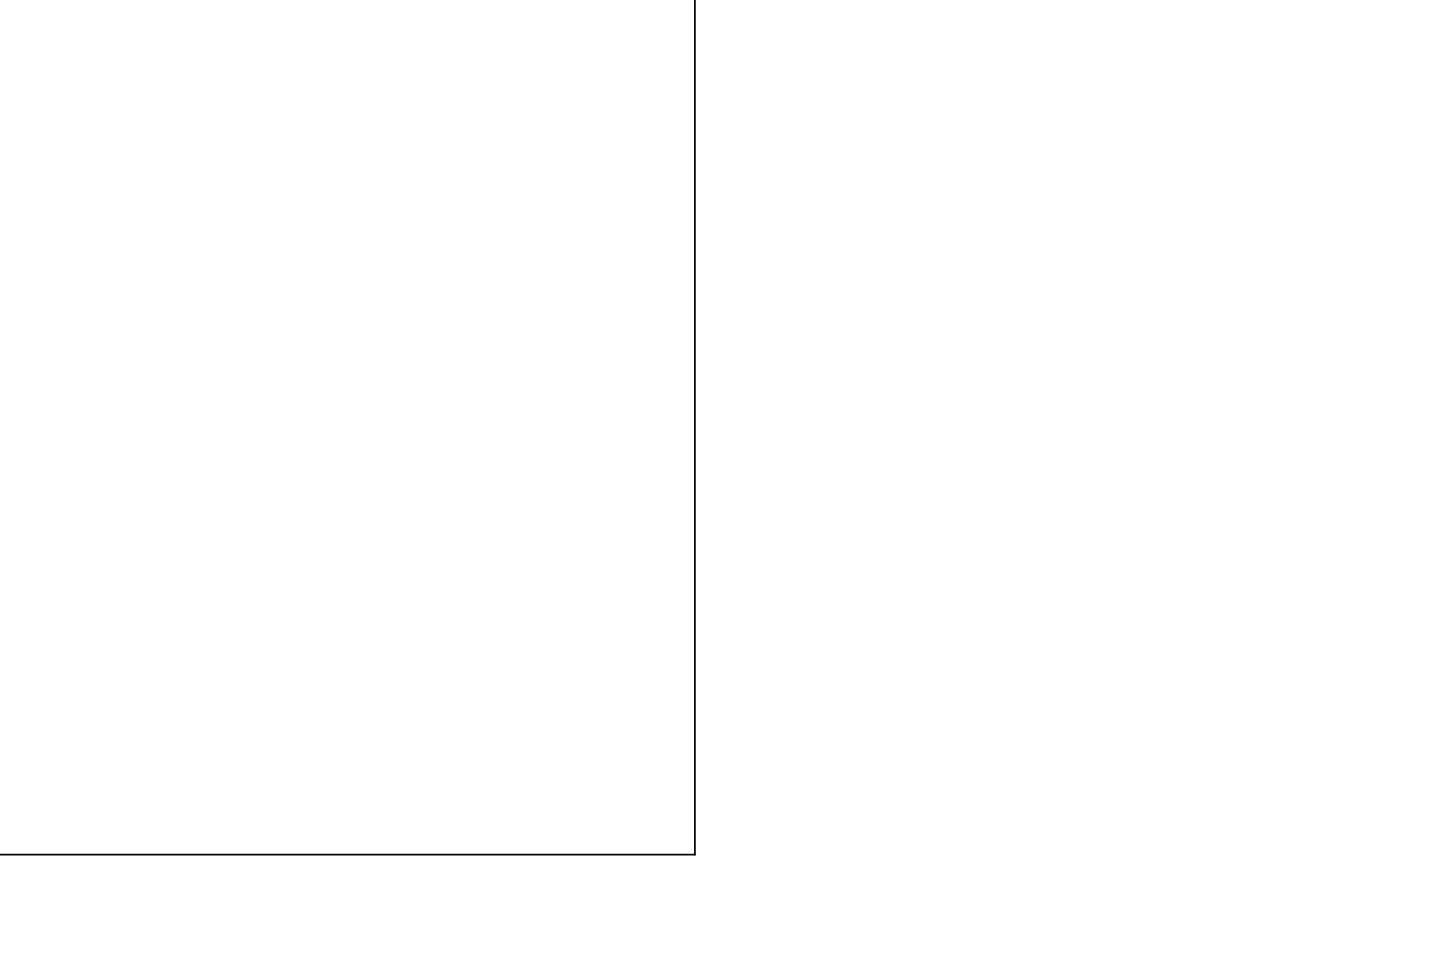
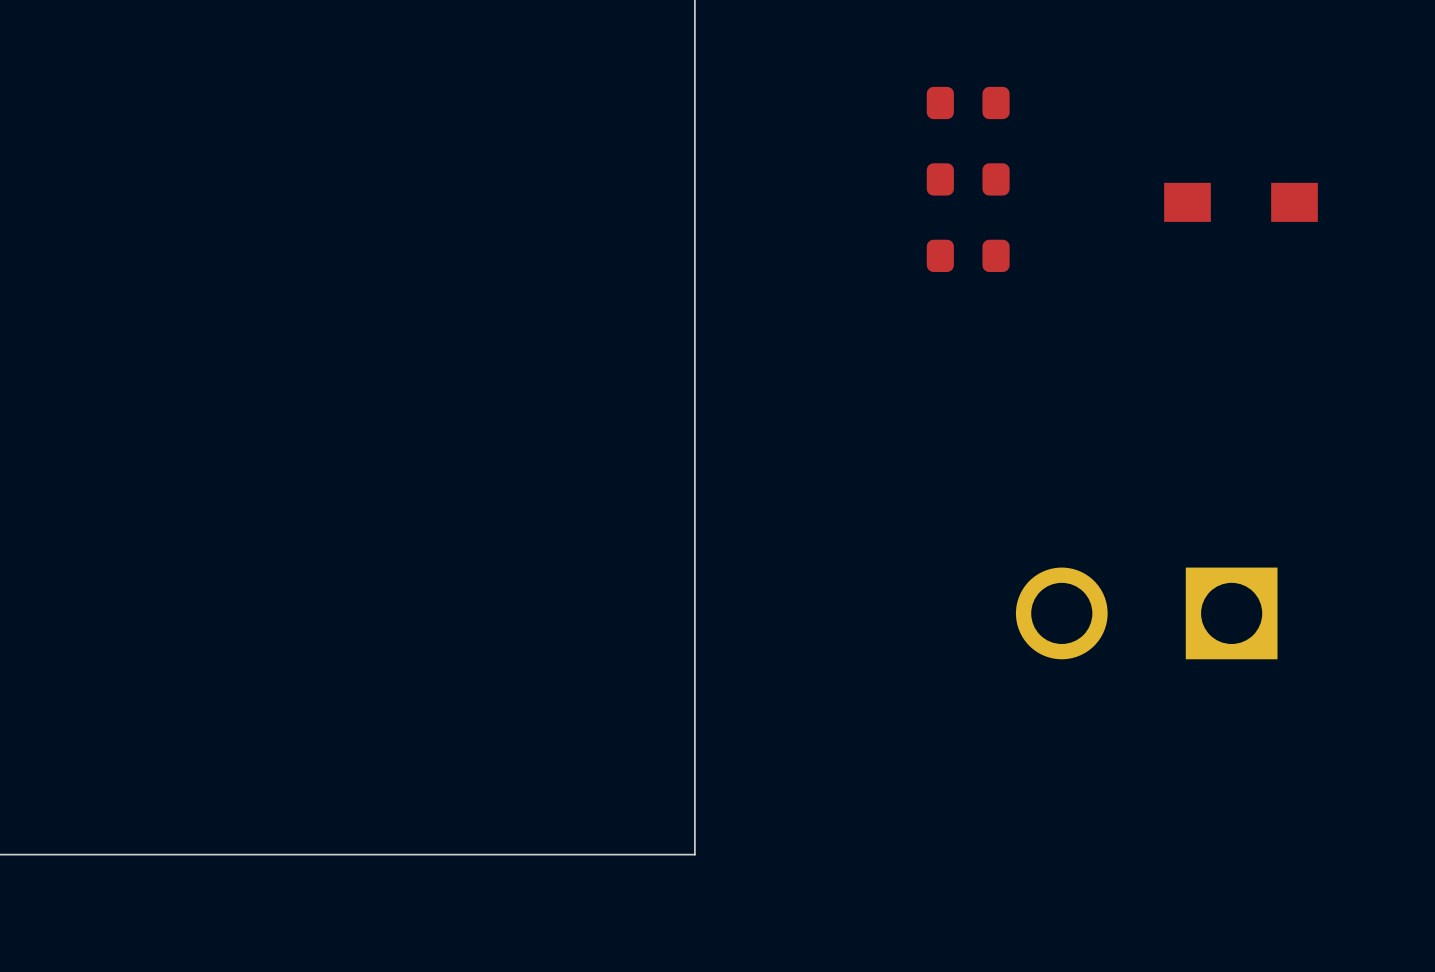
part: none -> (968, 102)
part: none -> (968, 179)
part: none -> (1240, 202)
part: none -> (968, 255)
part: none -> (1146, 613)

